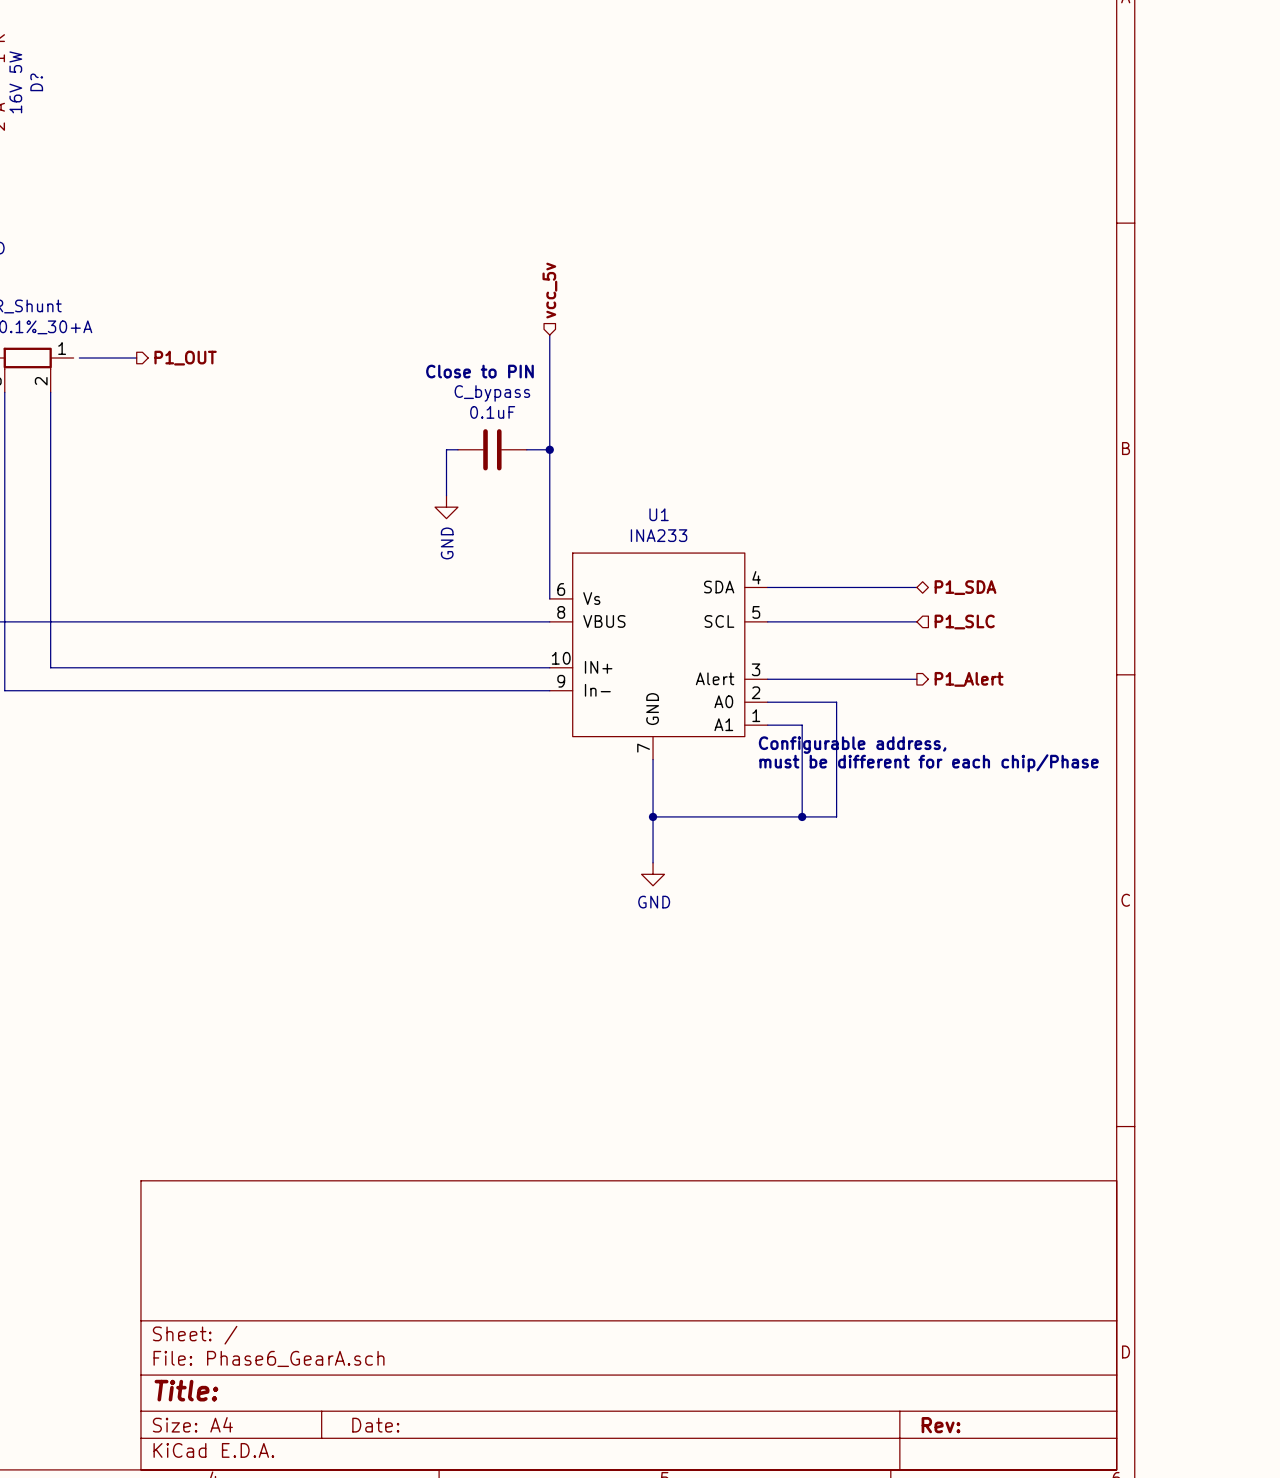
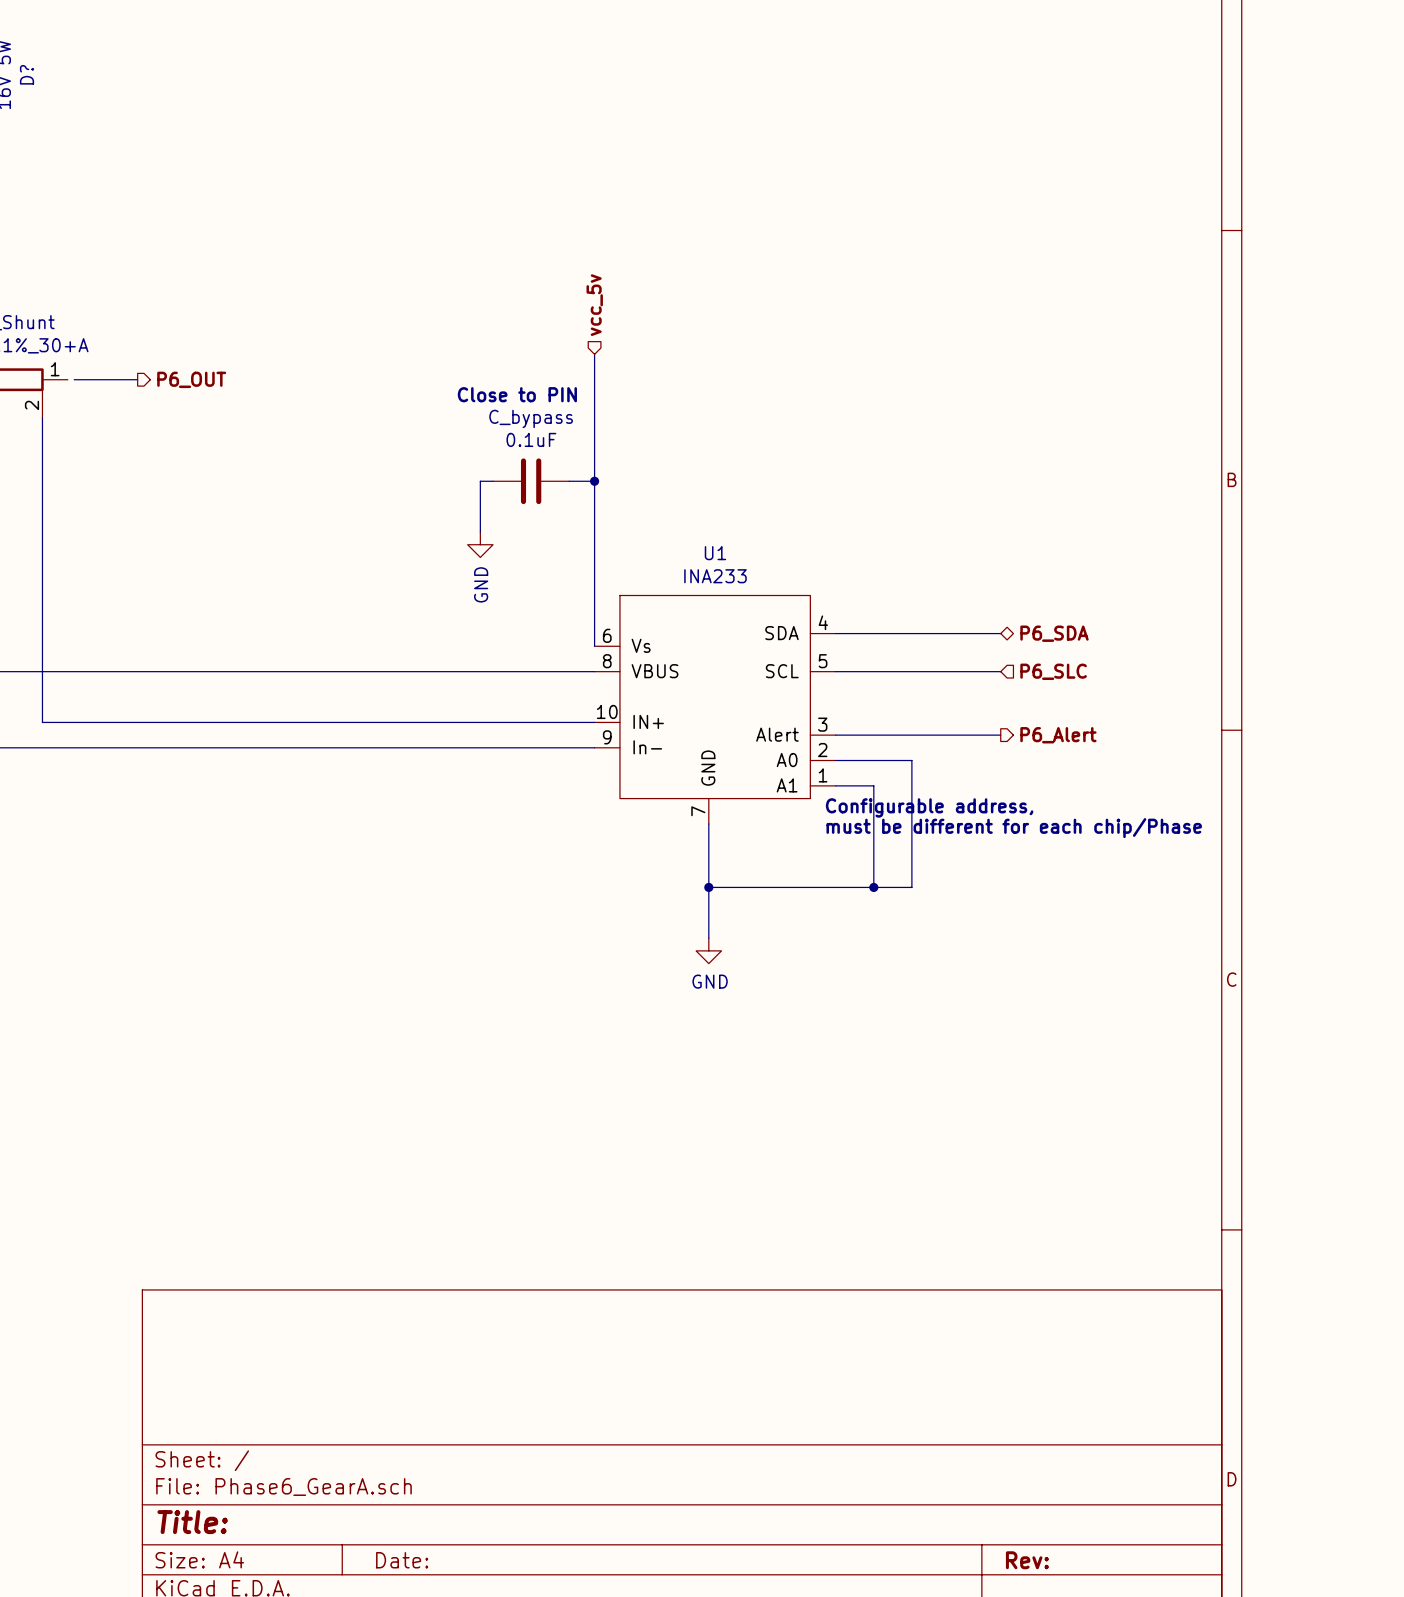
hierarchical label: P1_OUT (185, 358) -> P6_OUT (191, 379)
hierarchical label: P1_SDA (965, 587) -> P6_SDA (1054, 633)
hierarchical label: P1_SLC (964, 622) -> P6_SLC (1053, 671)
hierarchical label: P1_Alert (969, 679) -> P6_Alert (1058, 735)

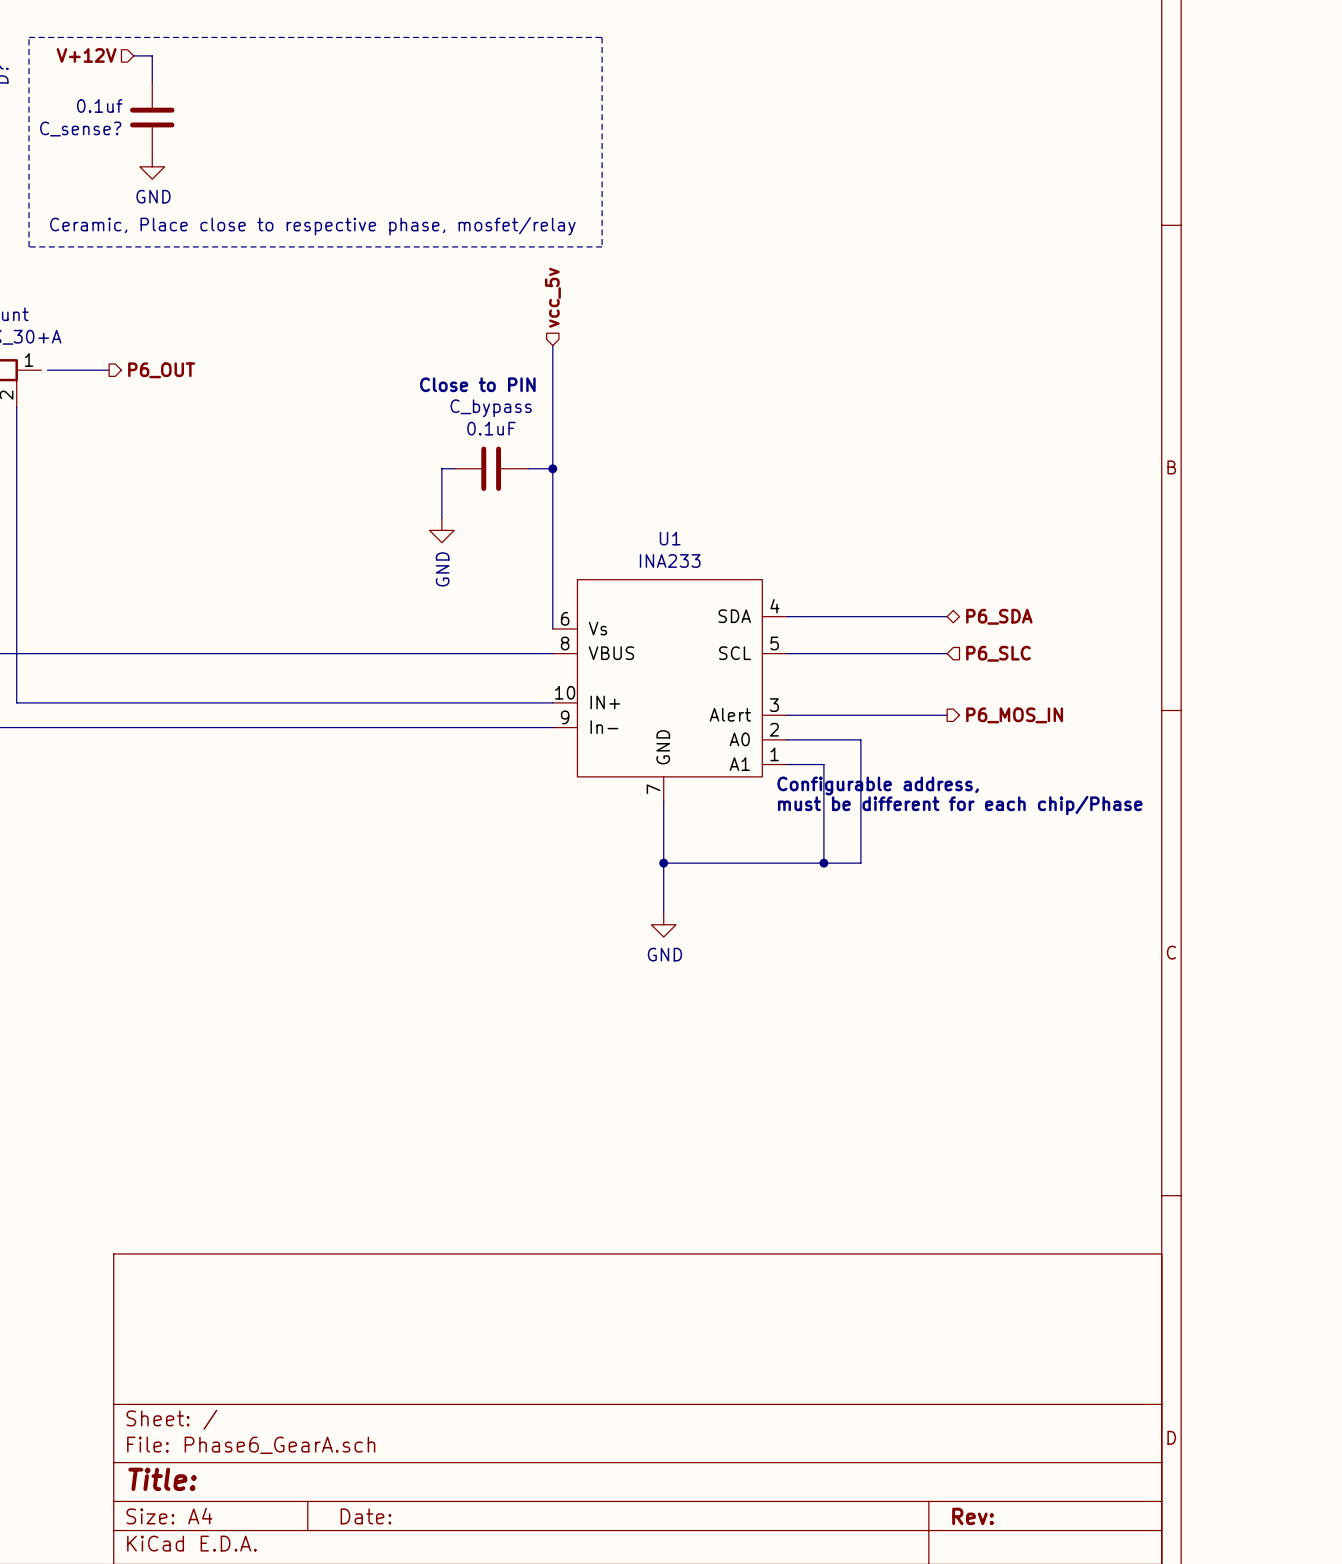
line: none -> (29, 37) (602, 37) (602, 246) (29, 246) (29, 37)
hierarchical label: none -> V+12V (86, 55)
wire: none -> (133, 55) (152, 55) (152, 80)
C_sense?: none -> 0.1uf (152, 117)
power symbol: none -> GND (152, 166)
text: none -> Ceramic, Place close to respective phase, mosfet/relay (312, 226)
hierarchical label: P6_Alert (1058, 735) -> P6_MOS_IN (1014, 715)

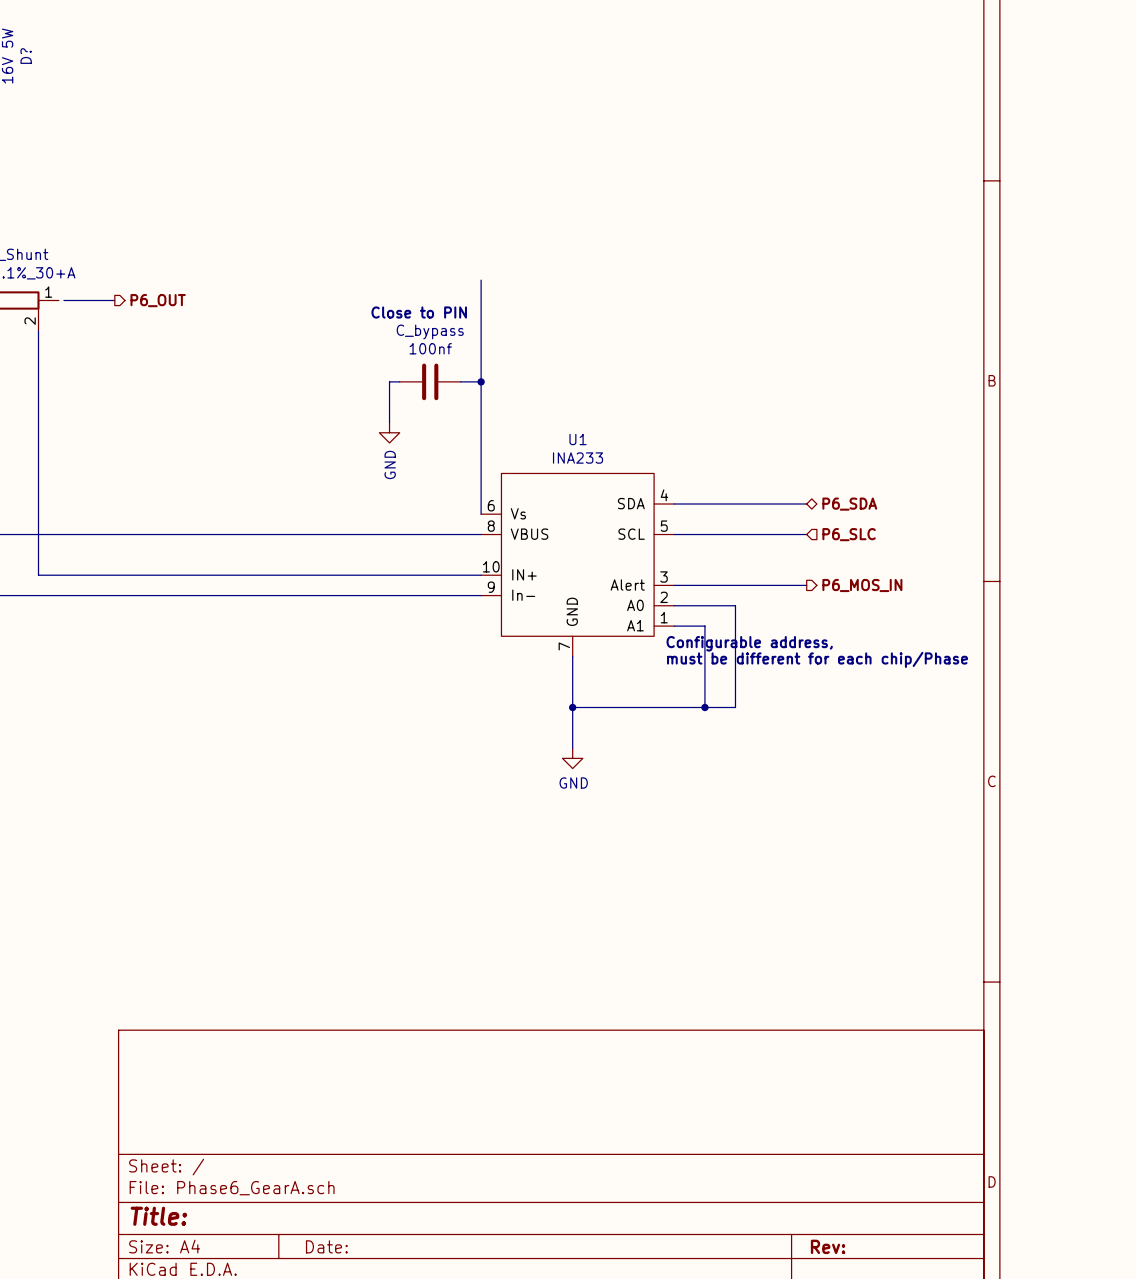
line: (29, 37) (602, 37) (602, 246) (29, 246) (29, 37) -> none
hierarchical label: V+12V (86, 55) -> none
wire: (133, 55) (152, 55) (152, 80) -> none
C_sense?: 0.1uf (152, 117) -> none
power symbol: GND (152, 166) -> none
text: Ceramic, Place close to respective phase, mosfet/relay (312, 226) -> none
hierarchical label: vcc_5v (552, 297) -> none
C_bypass value: 0.1uF (491, 428) -> 100nf (430, 348)

